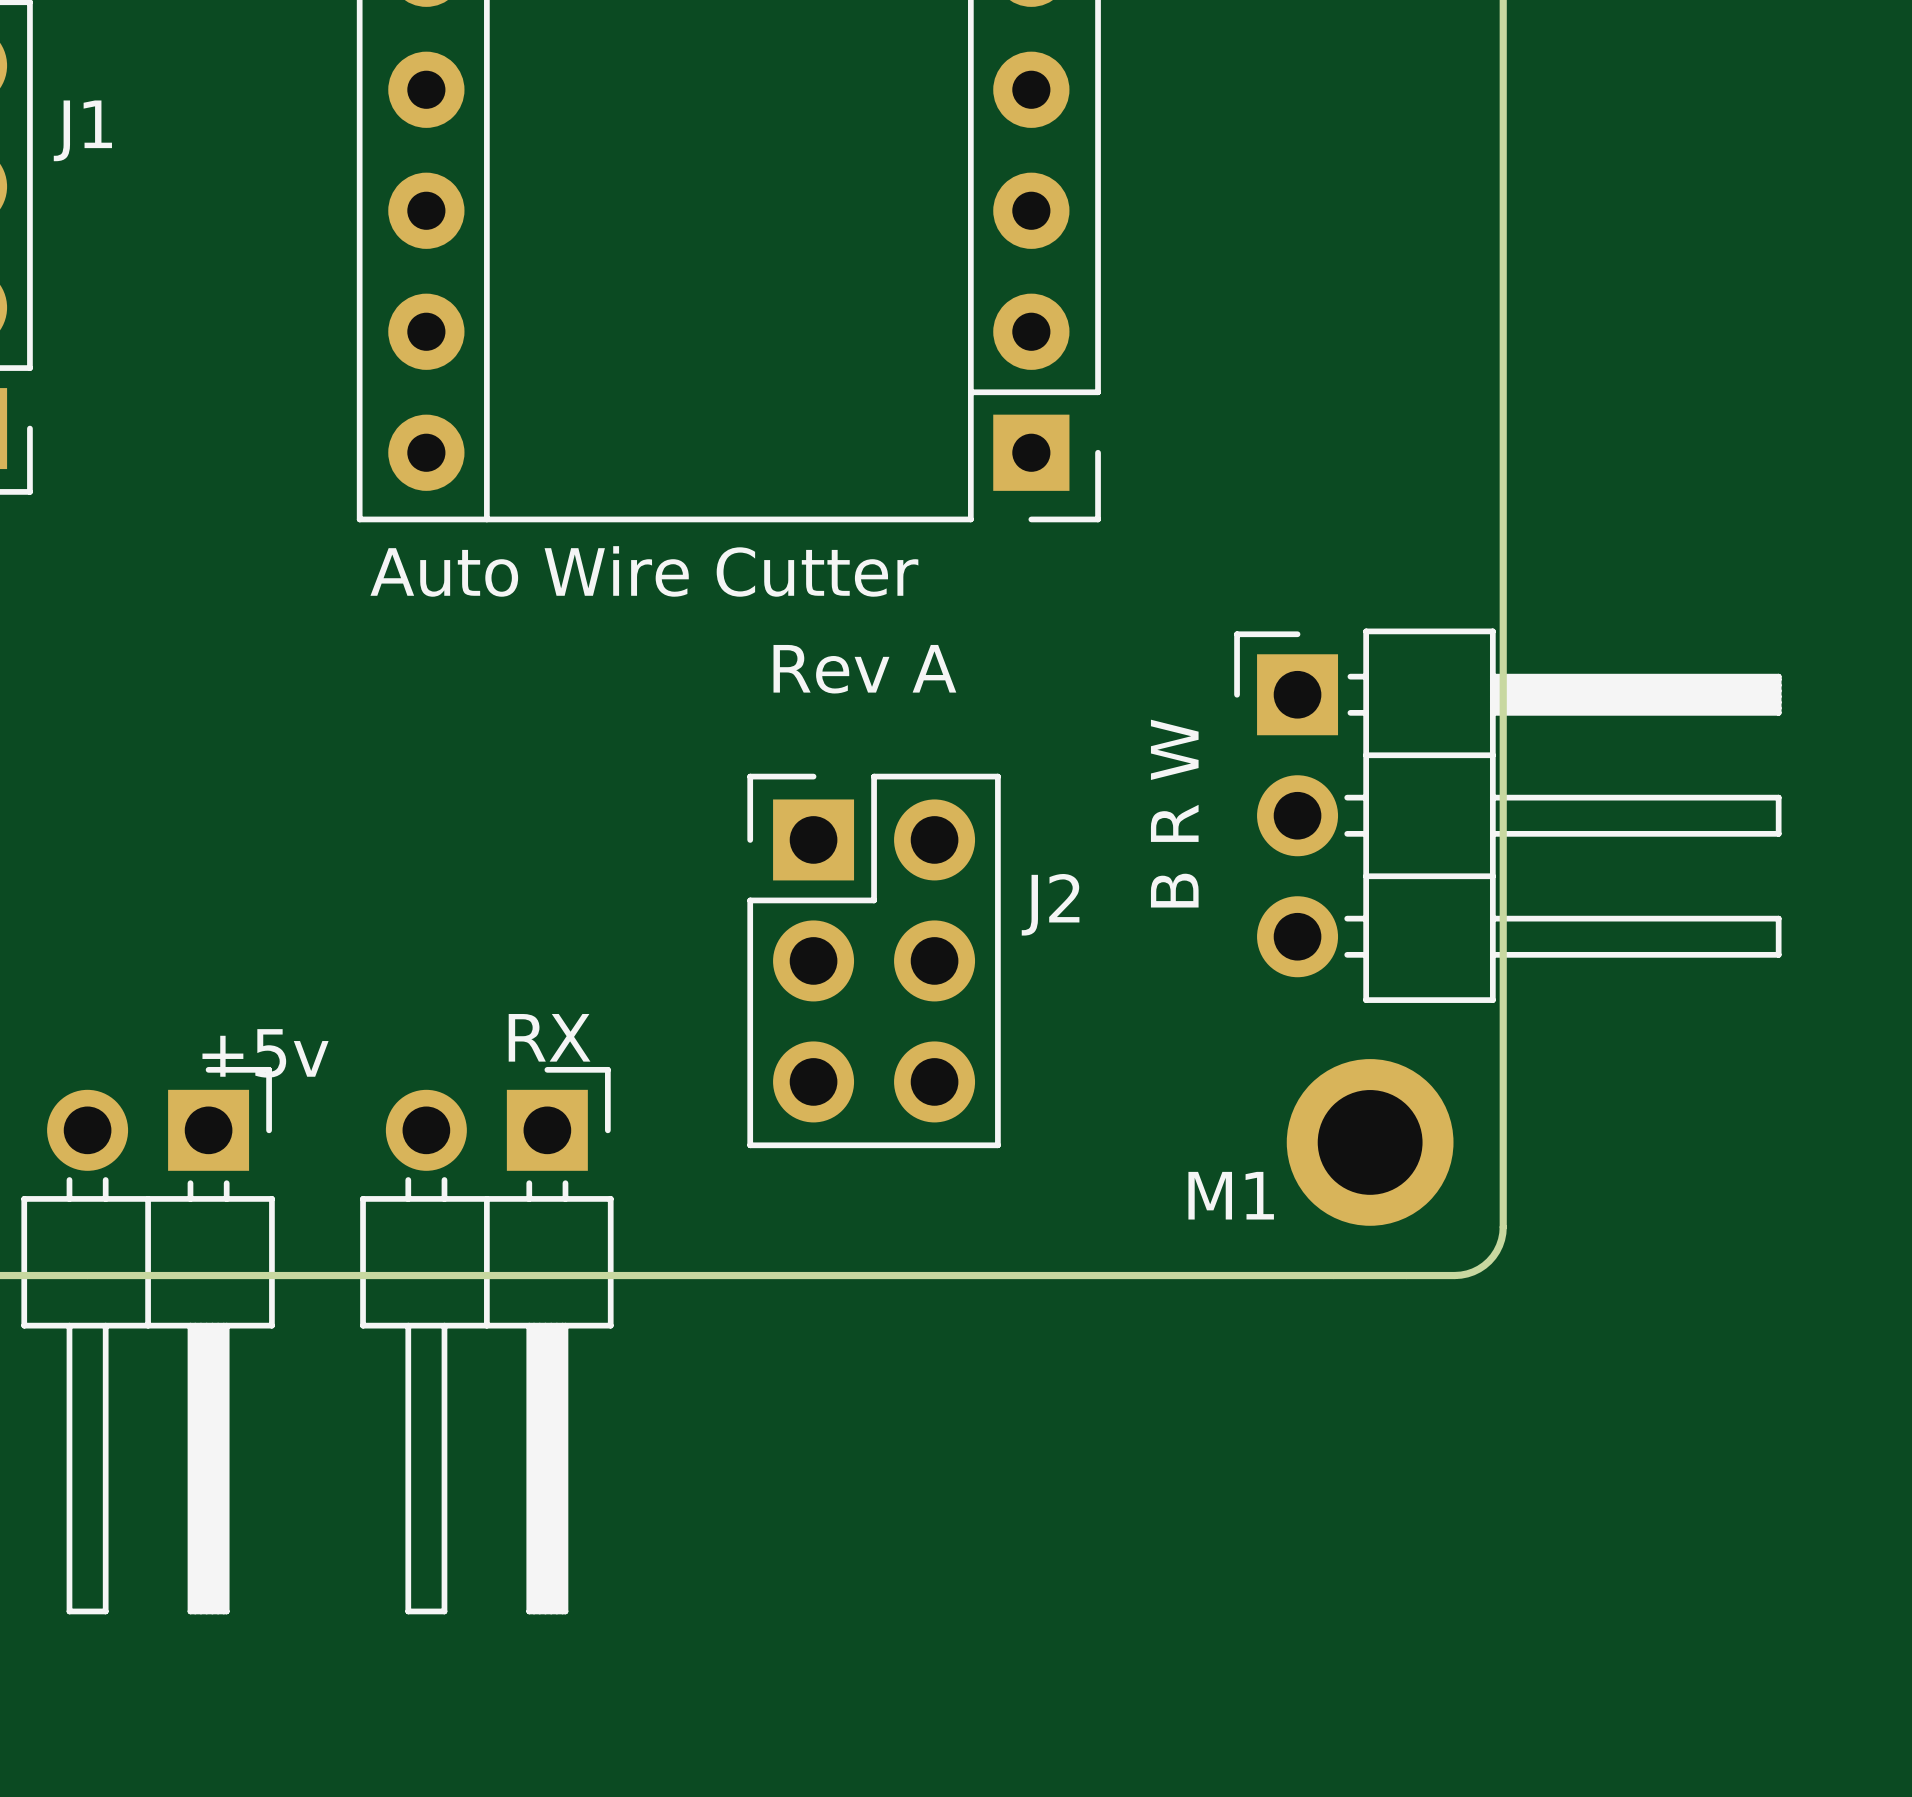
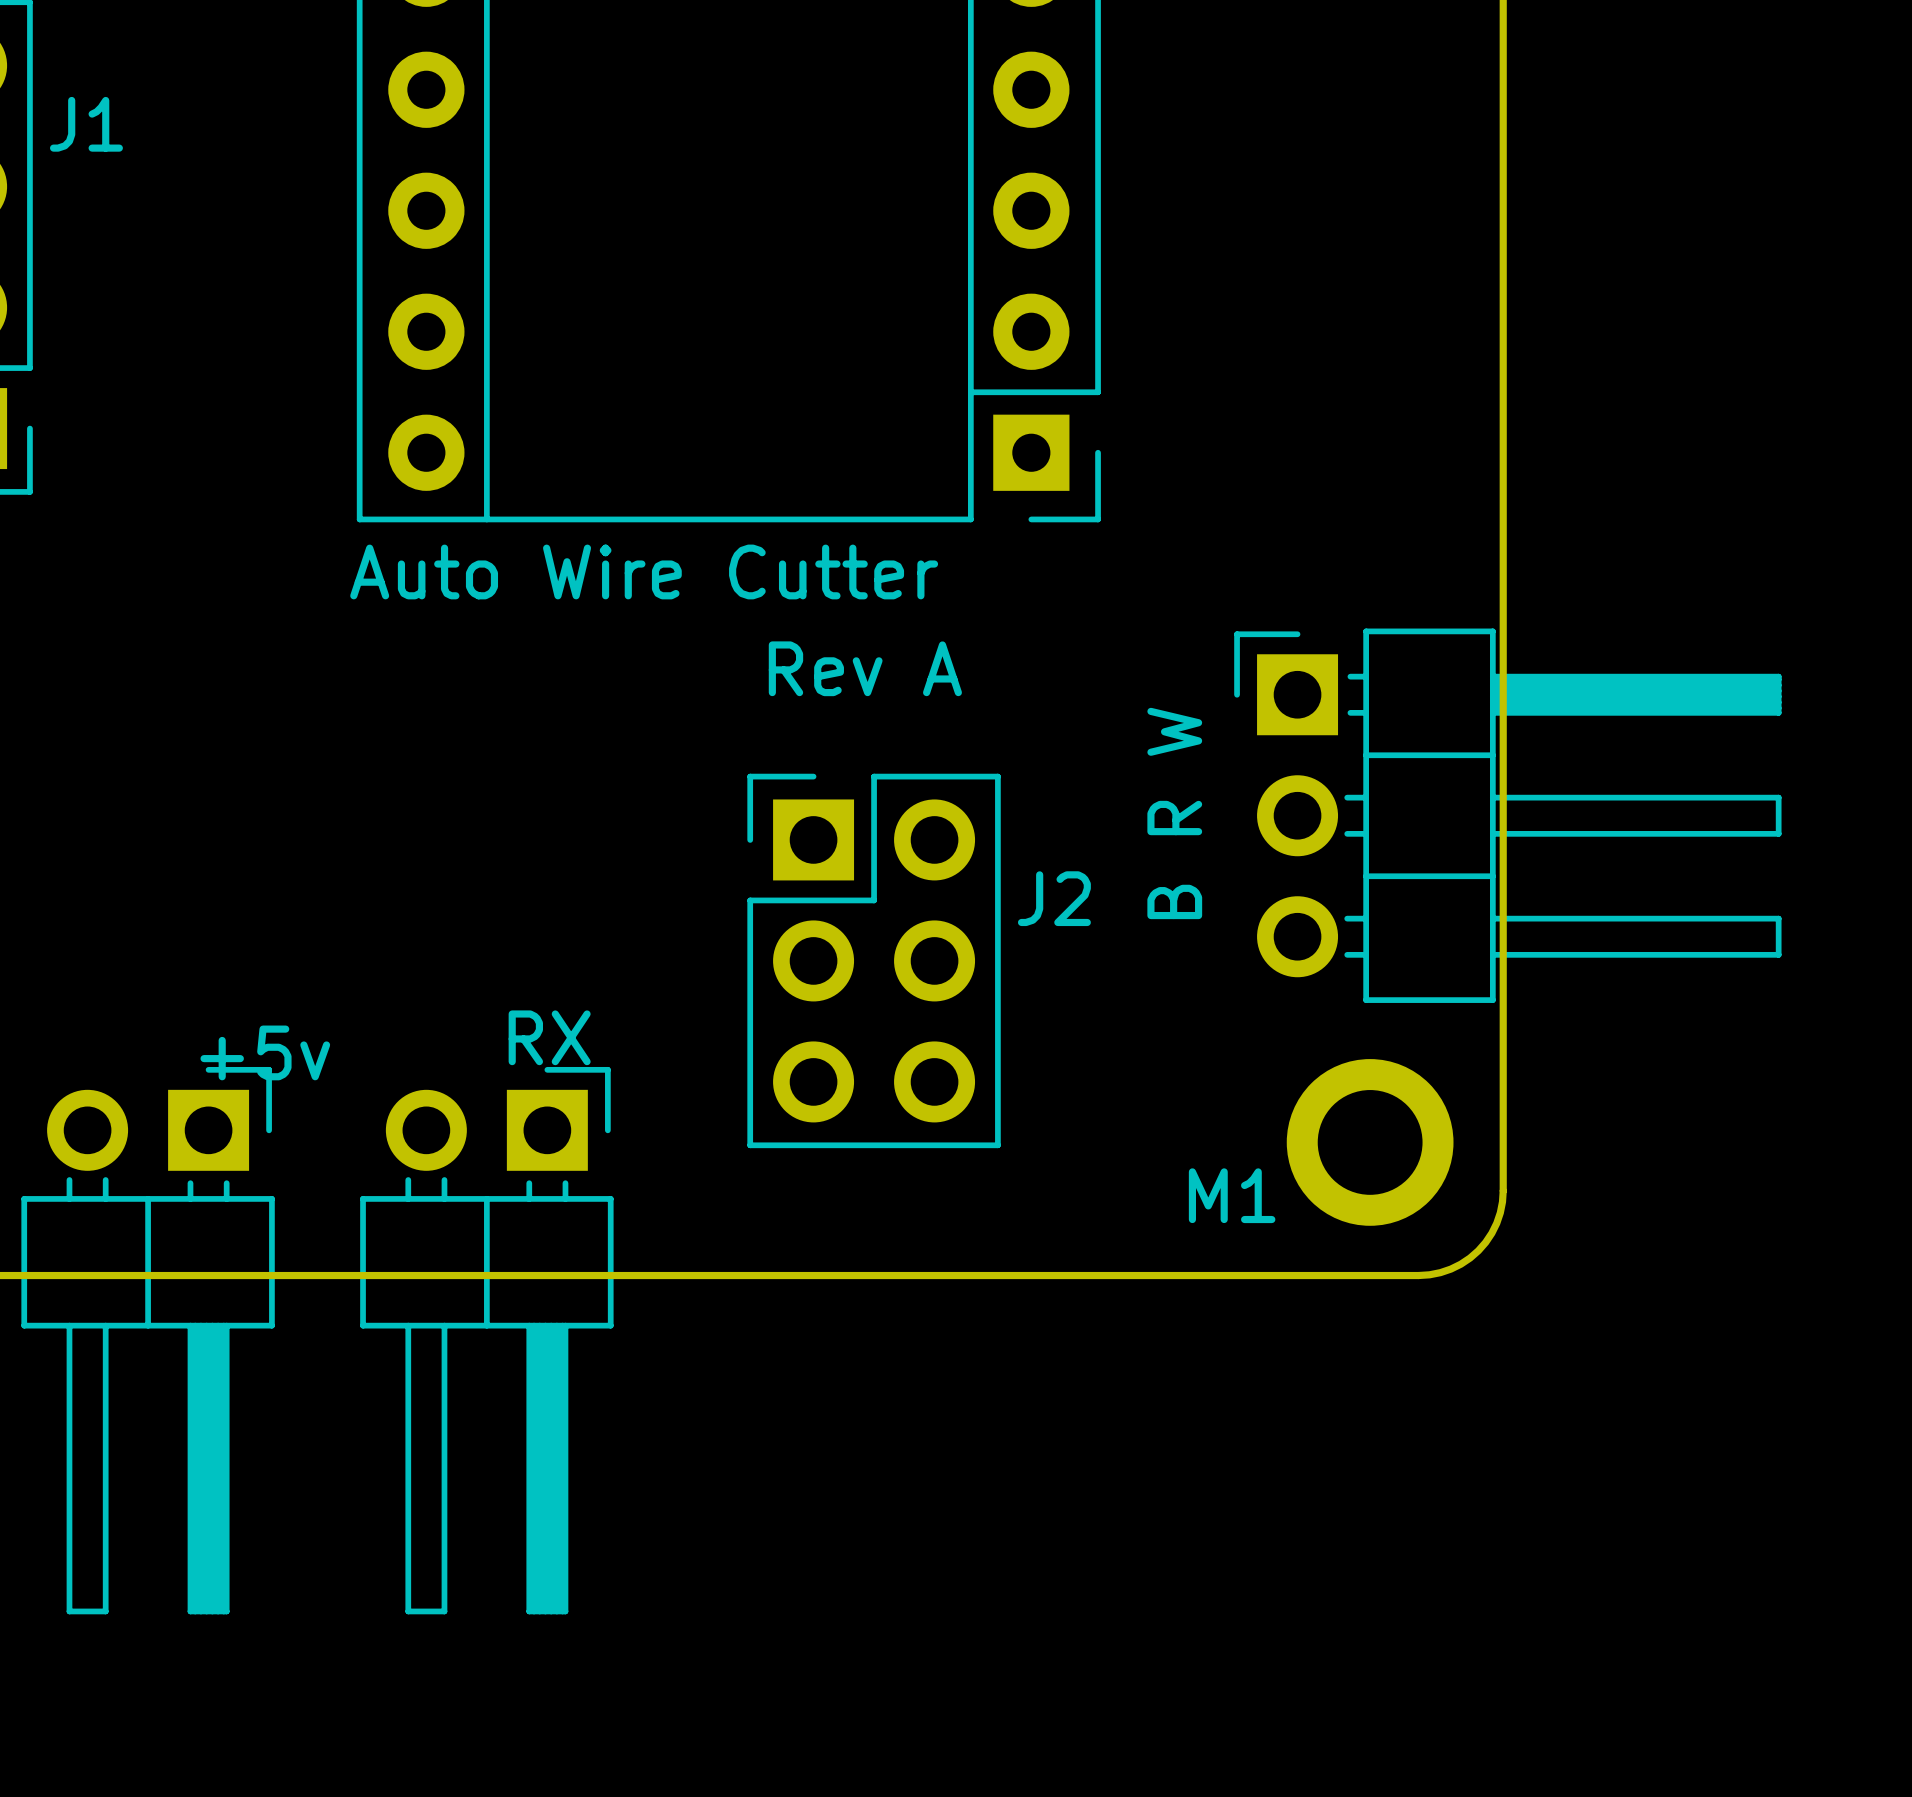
board edge: (1503, 1190) (1501, 1239) (1496, 1251) (1489, 1261) (1479, 1269) (1467, 1273) (1418, 1275) -> (1503, 1190) (1496, 1223) (1478, 1250) (1450, 1269) (1418, 1275)

